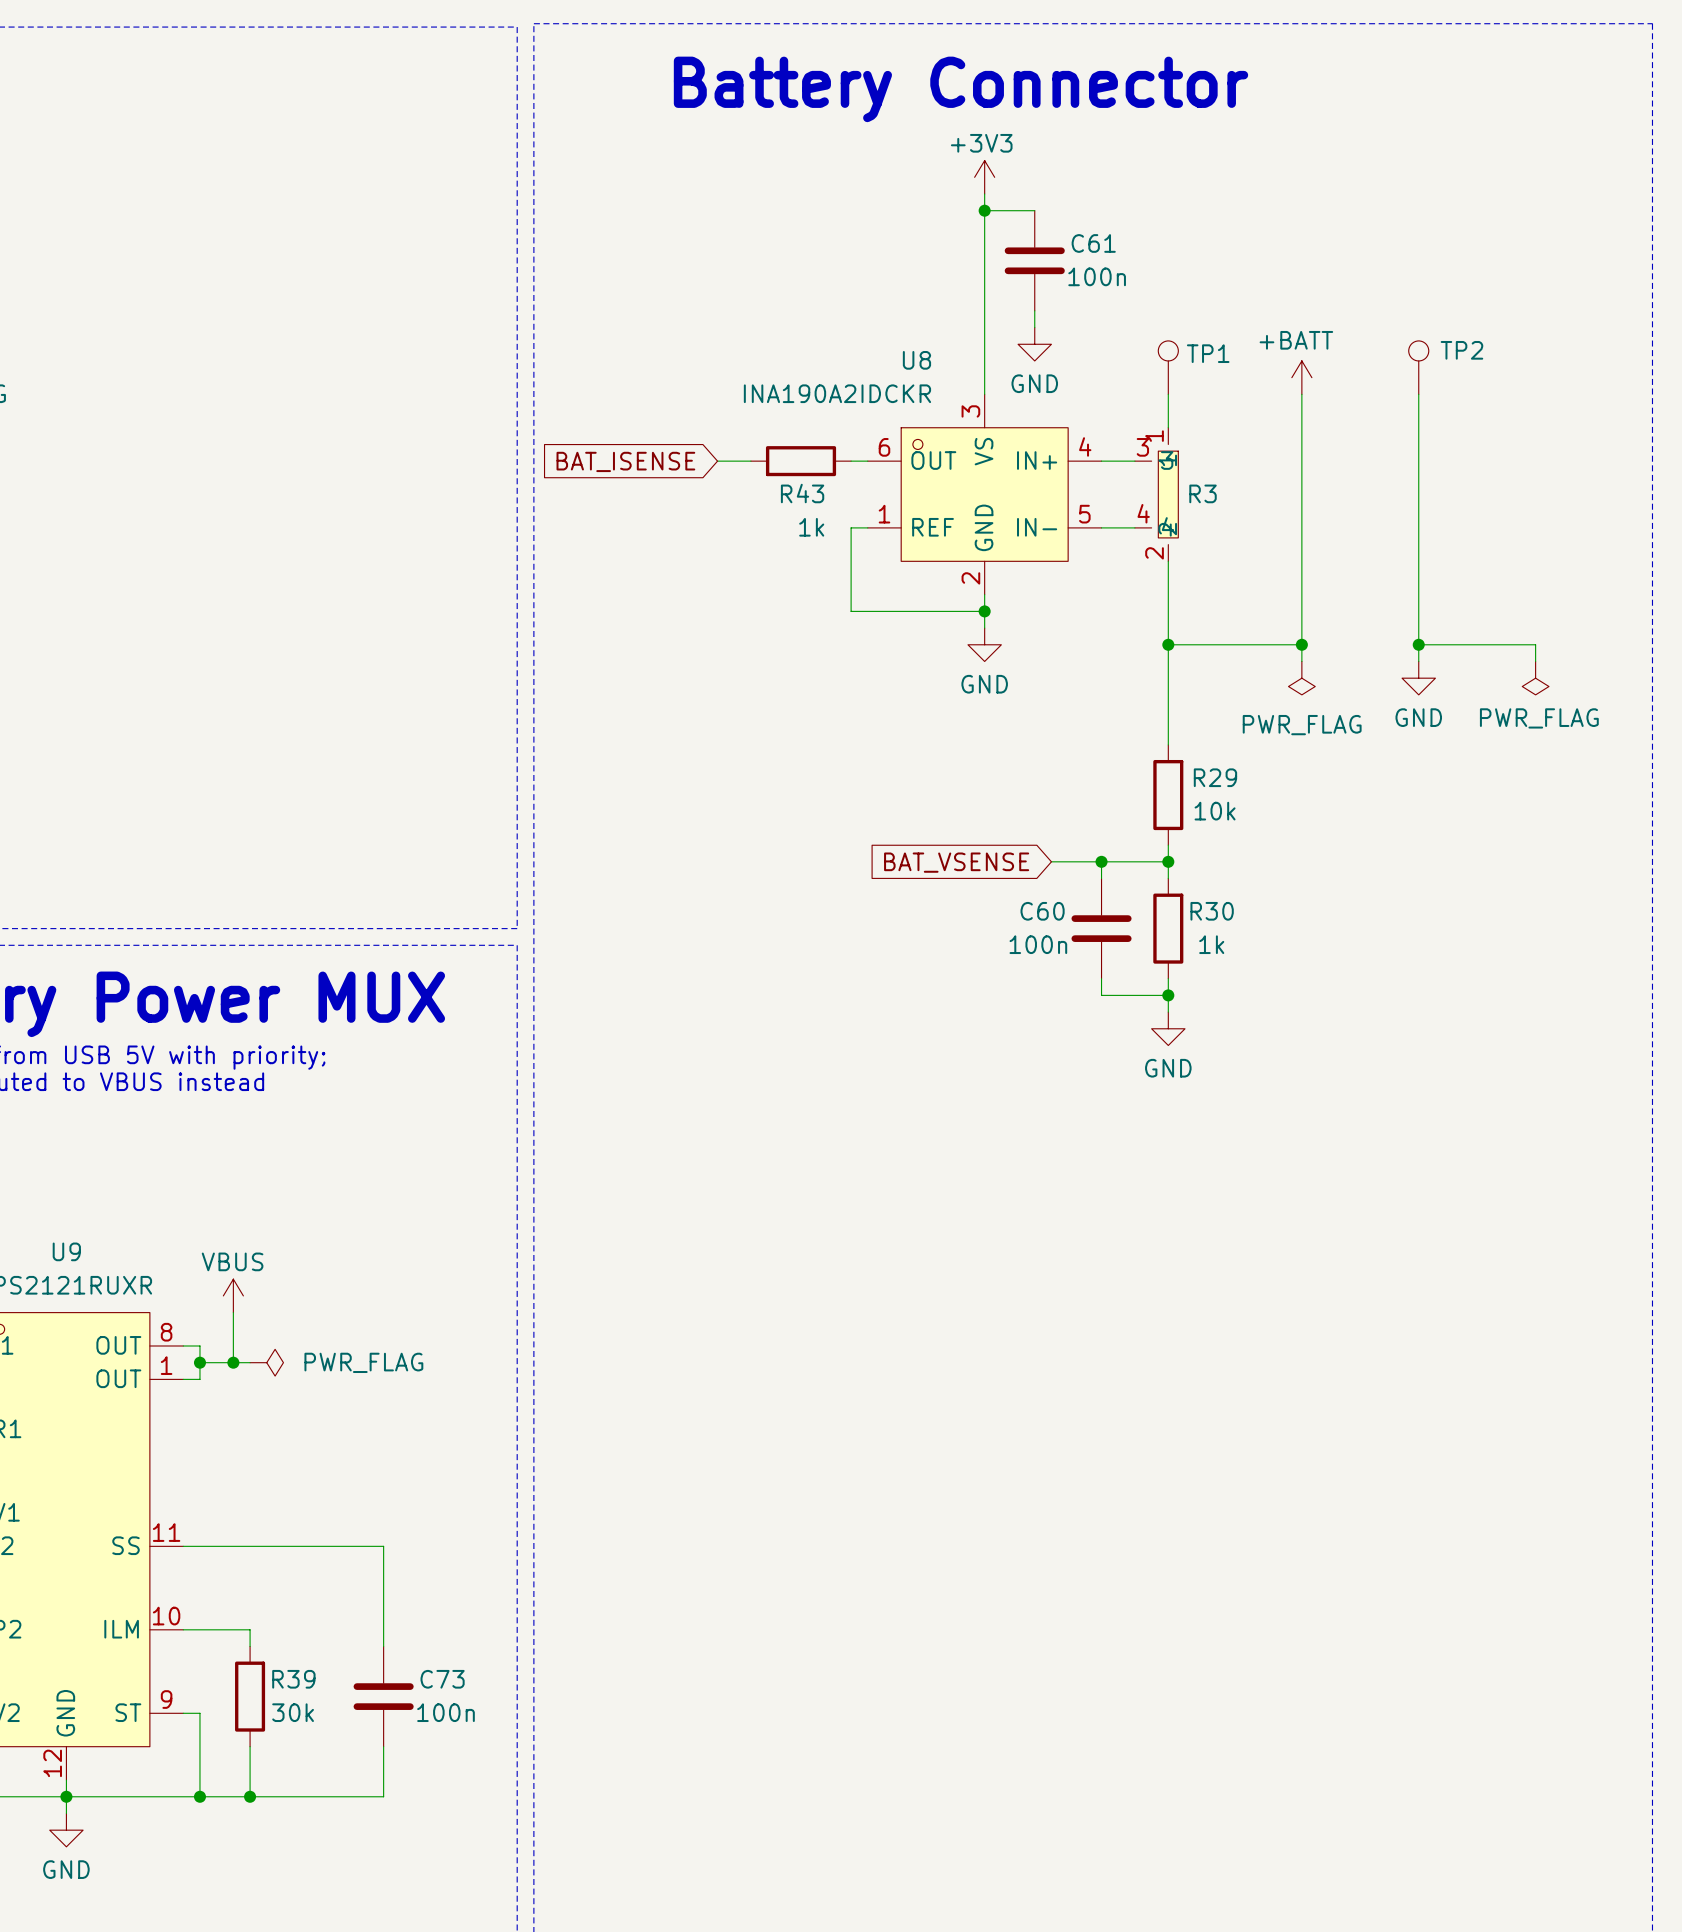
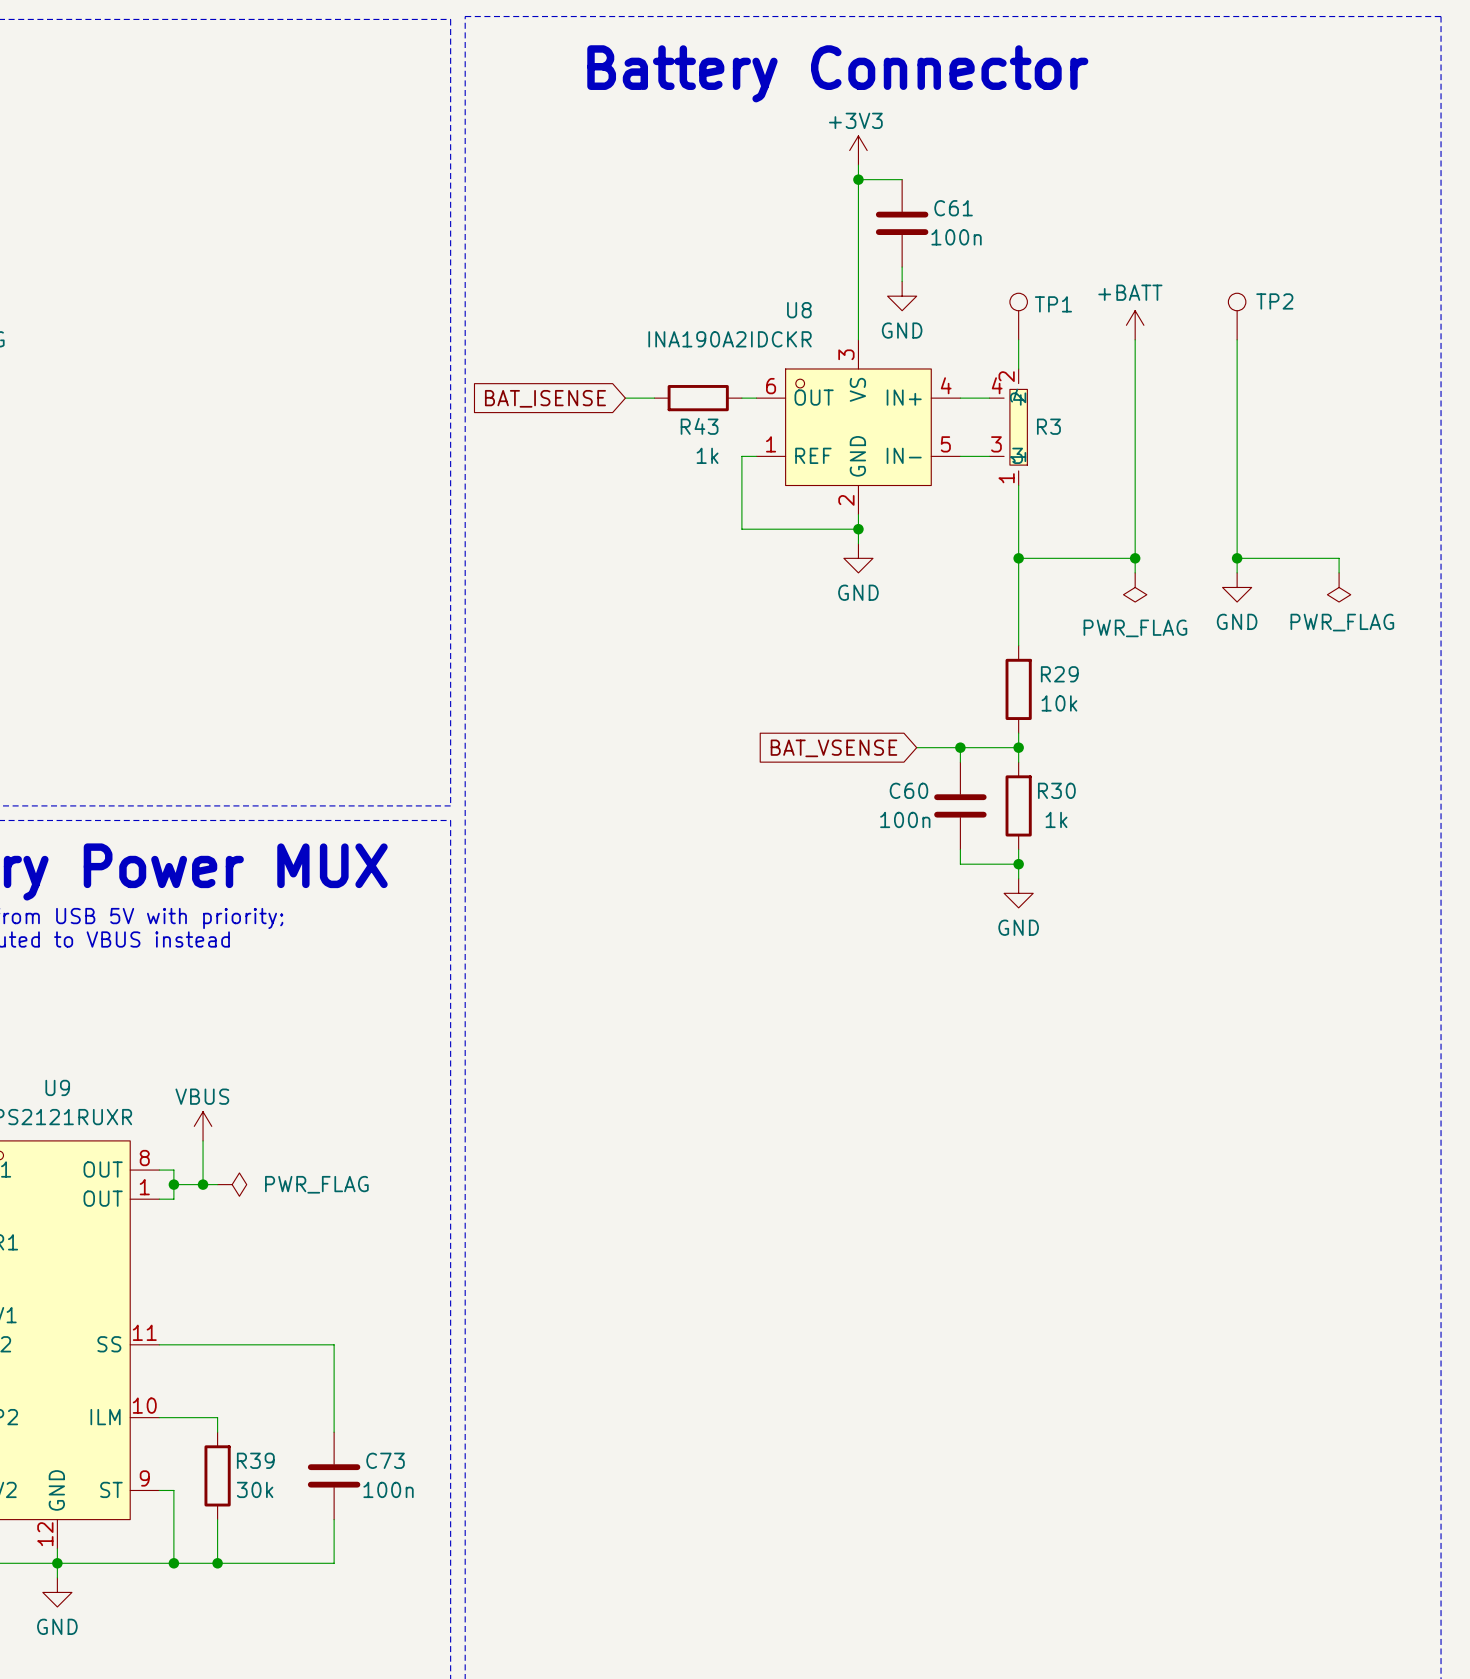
R3 flip: as is (1168, 494) -> up-down (1018, 427)

